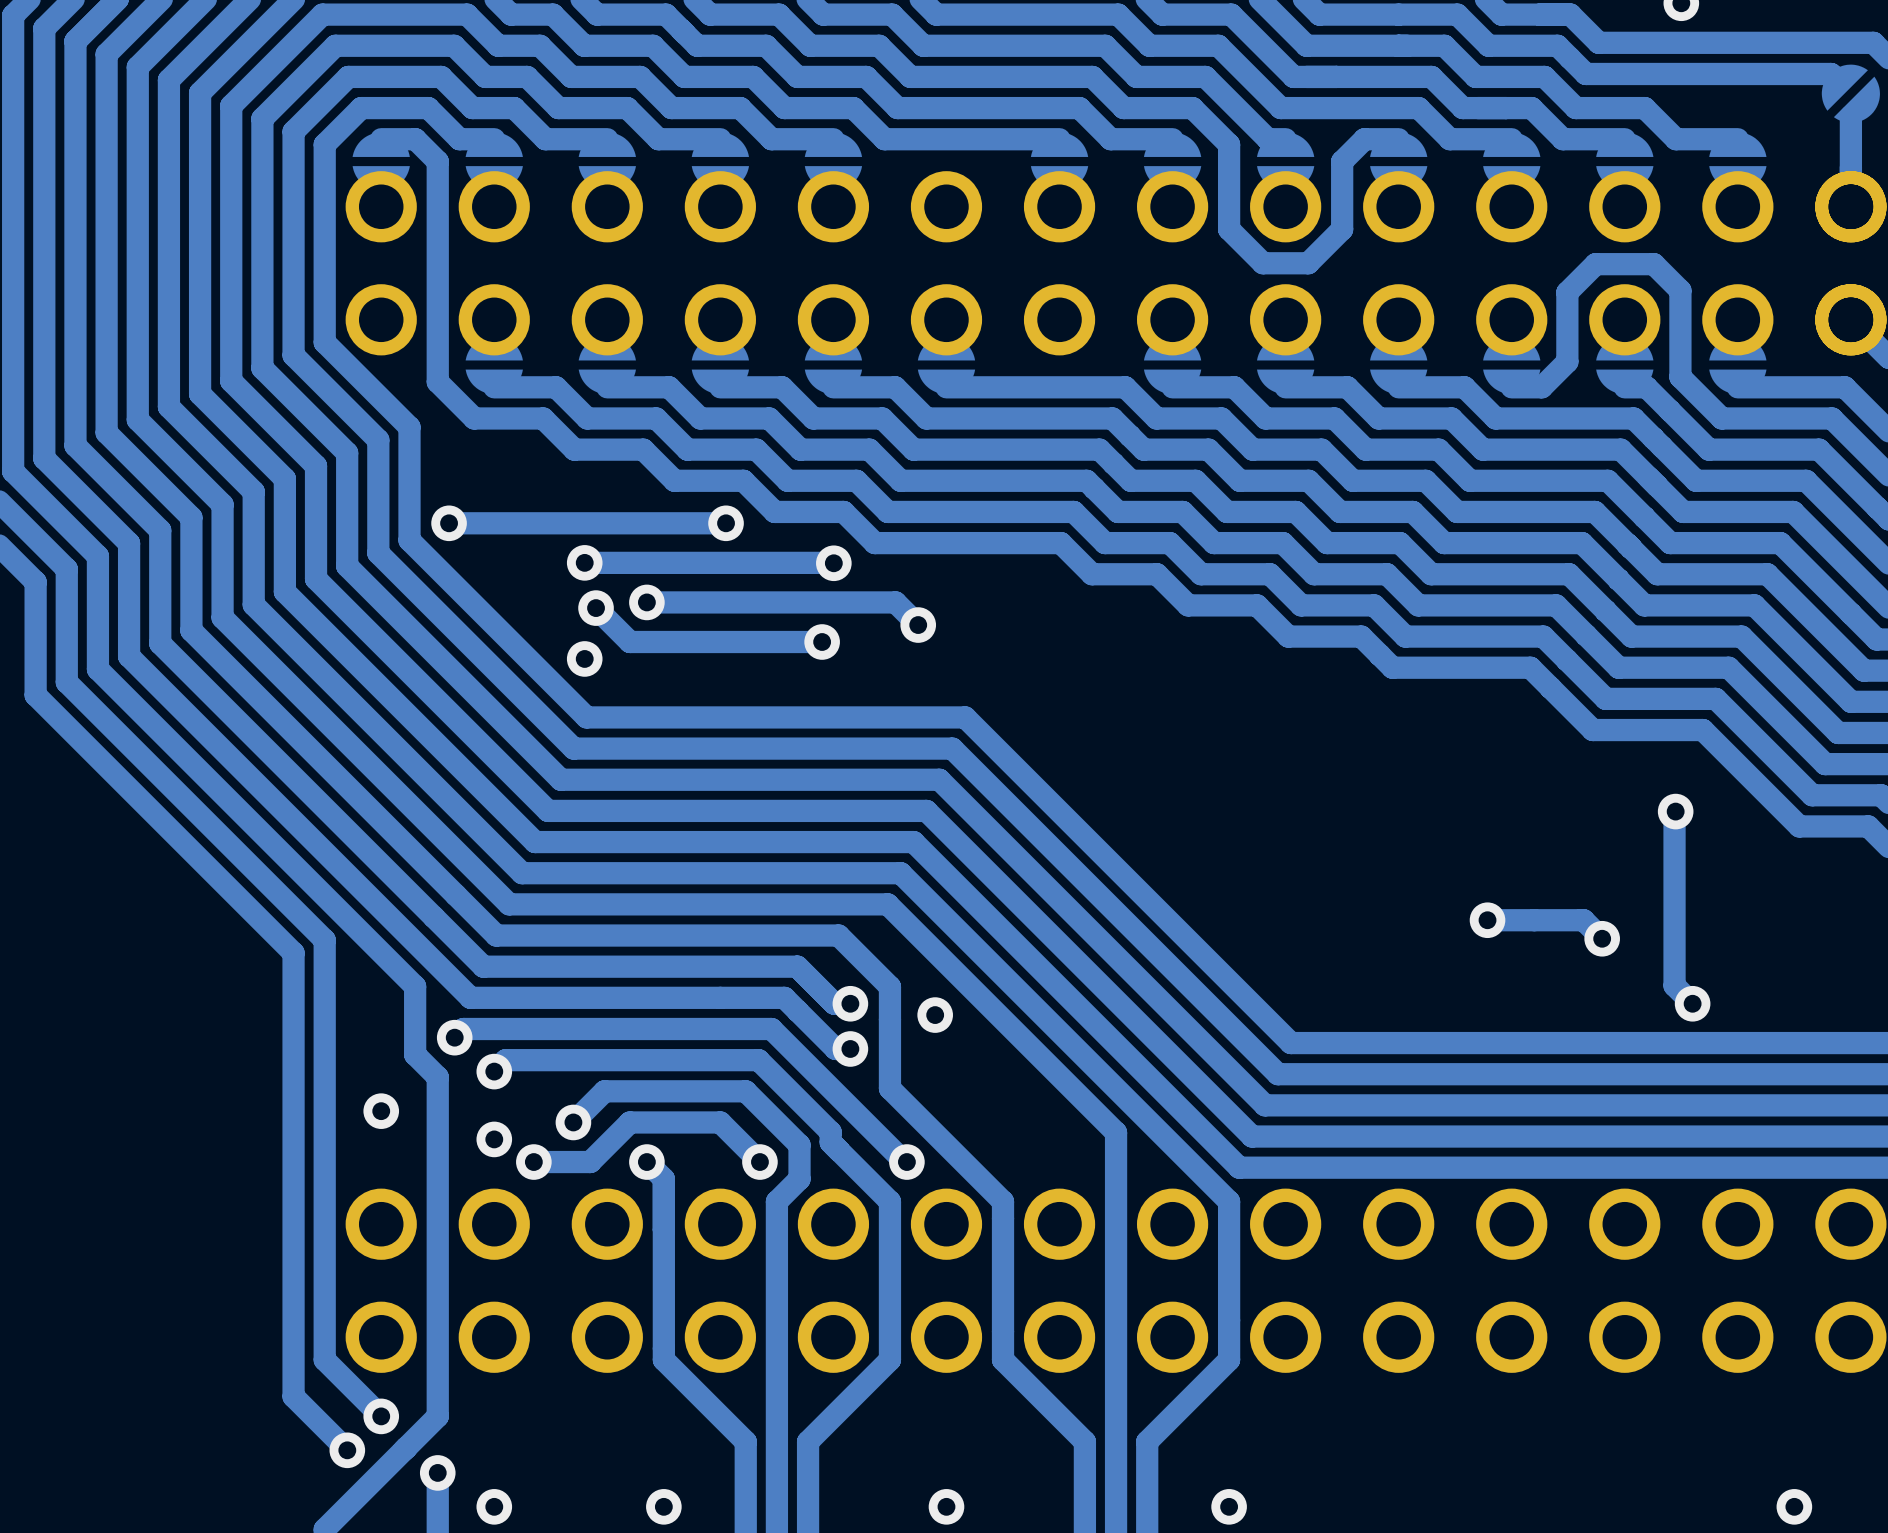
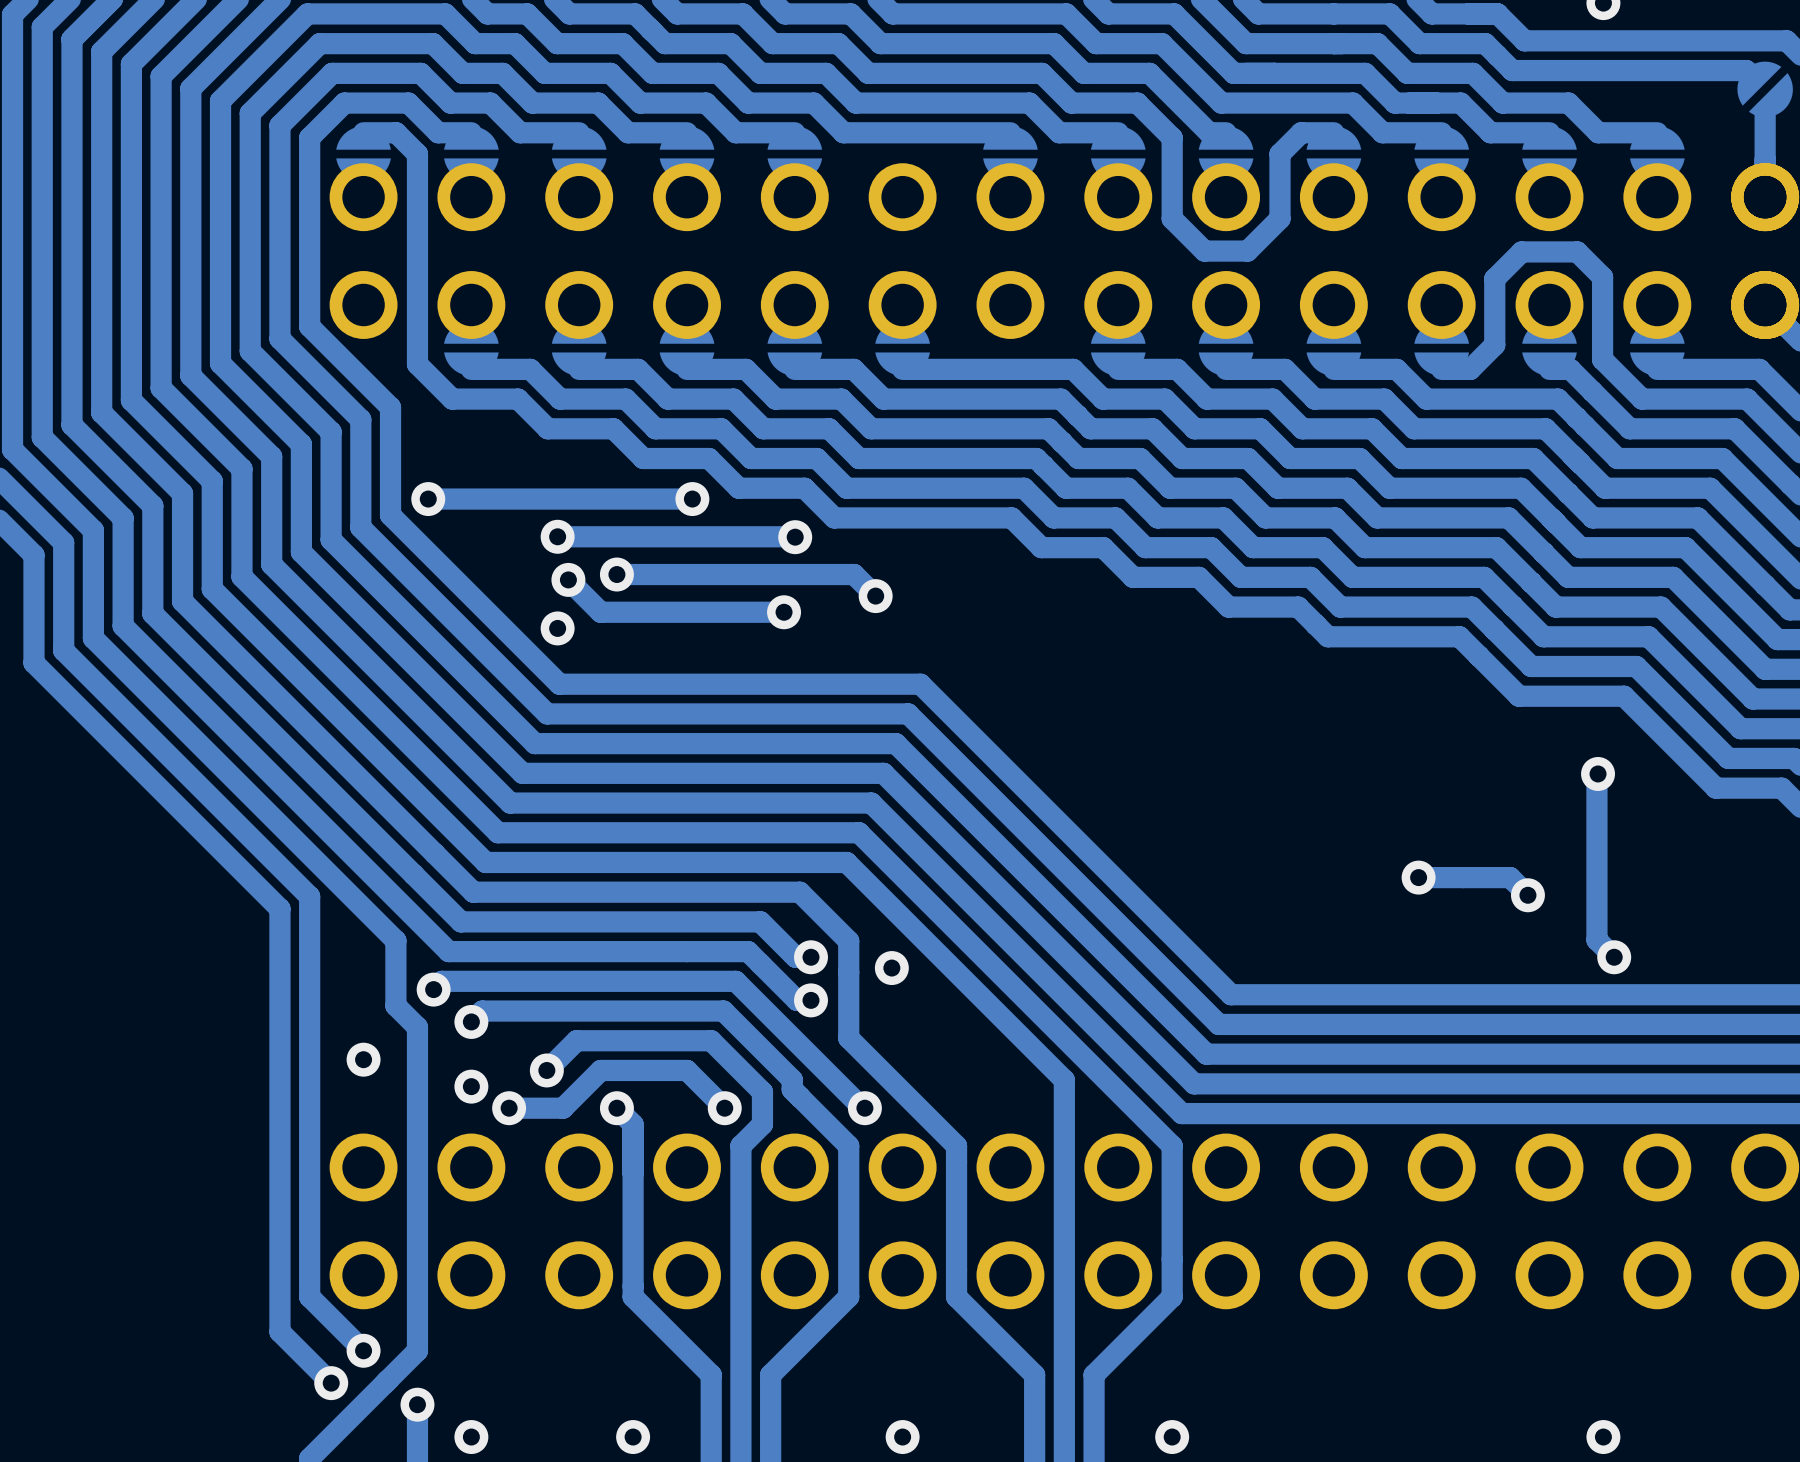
via position: (1794, 1506) -> (1603, 1437)

